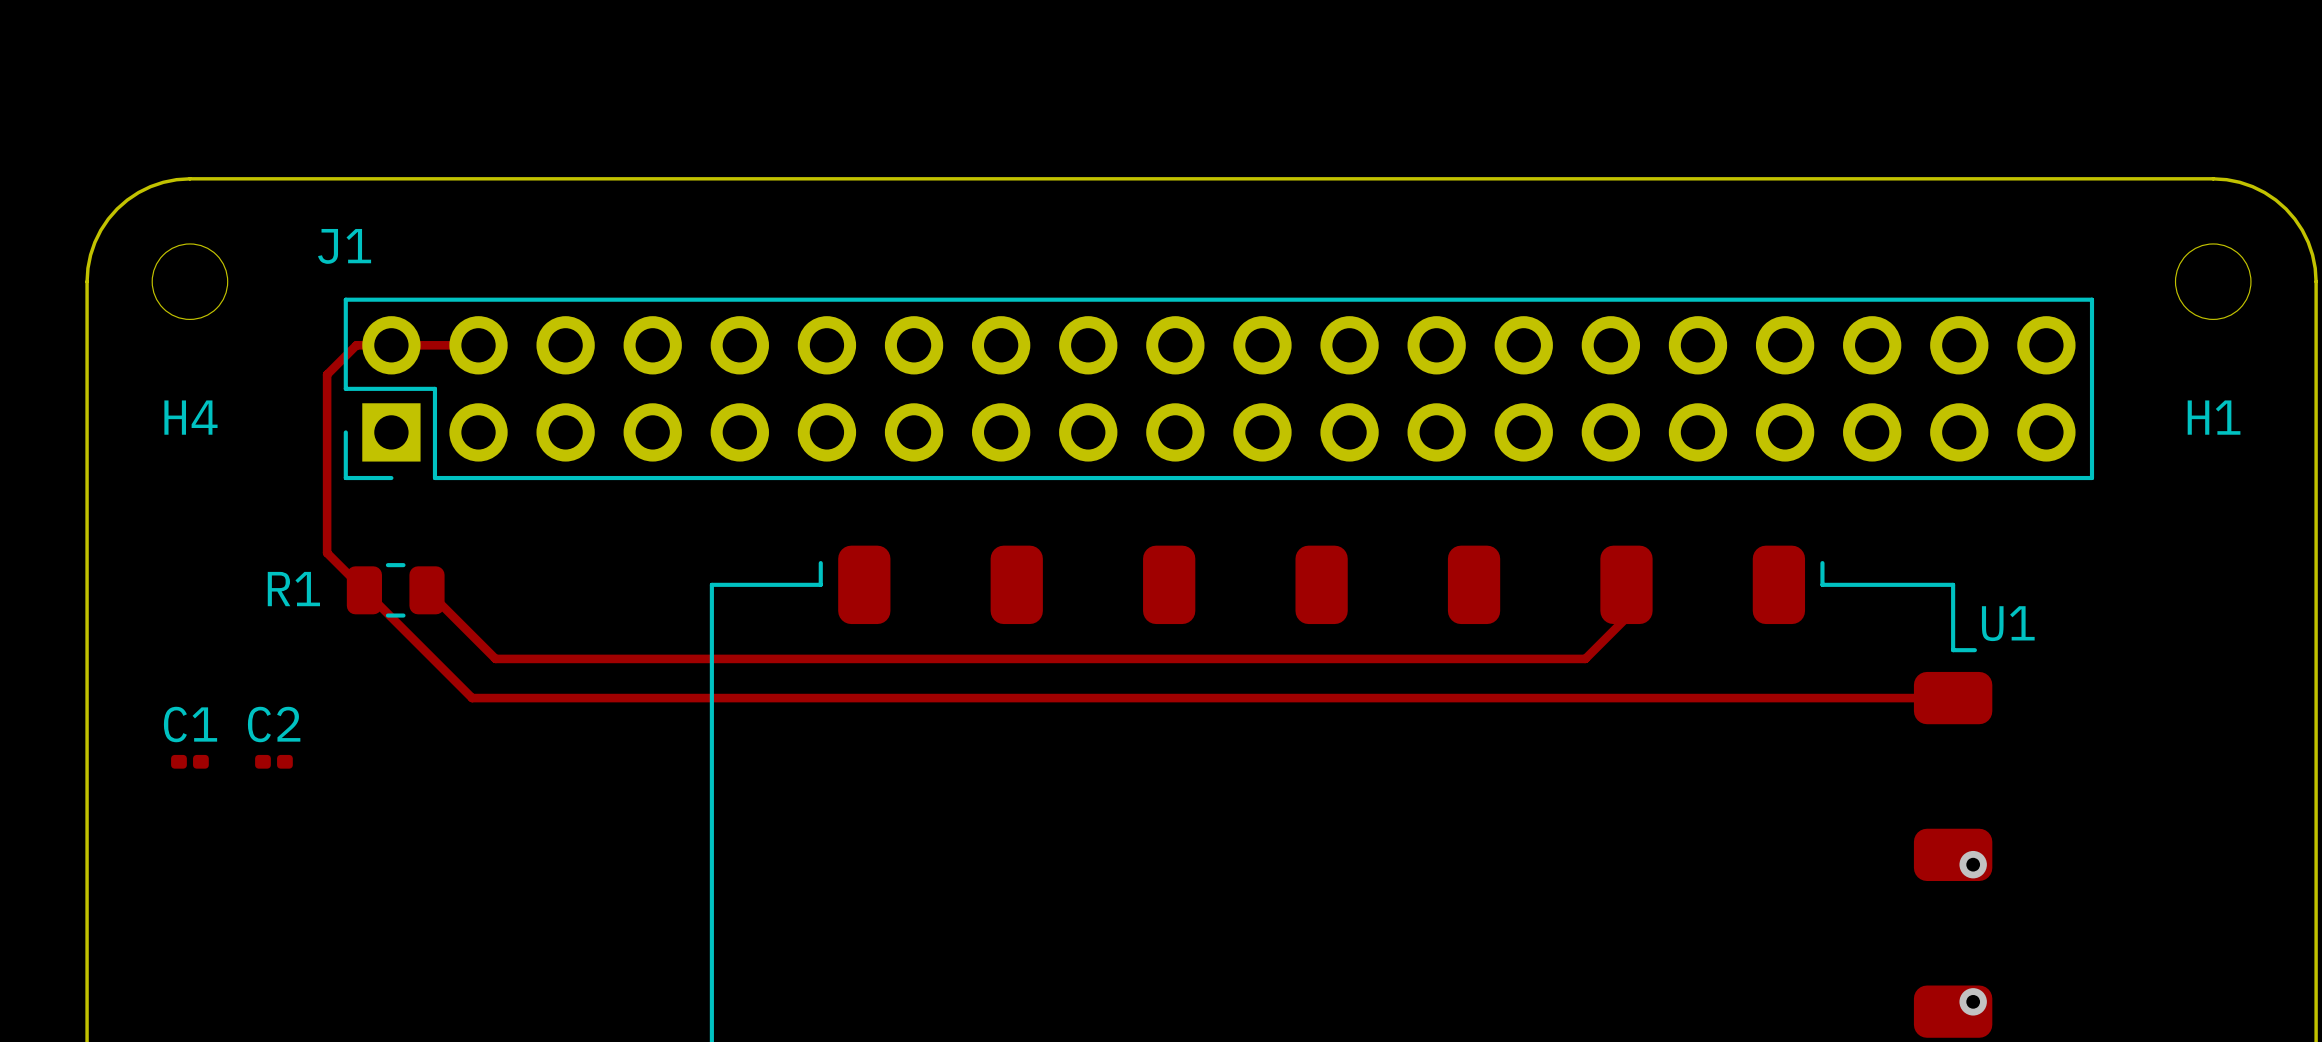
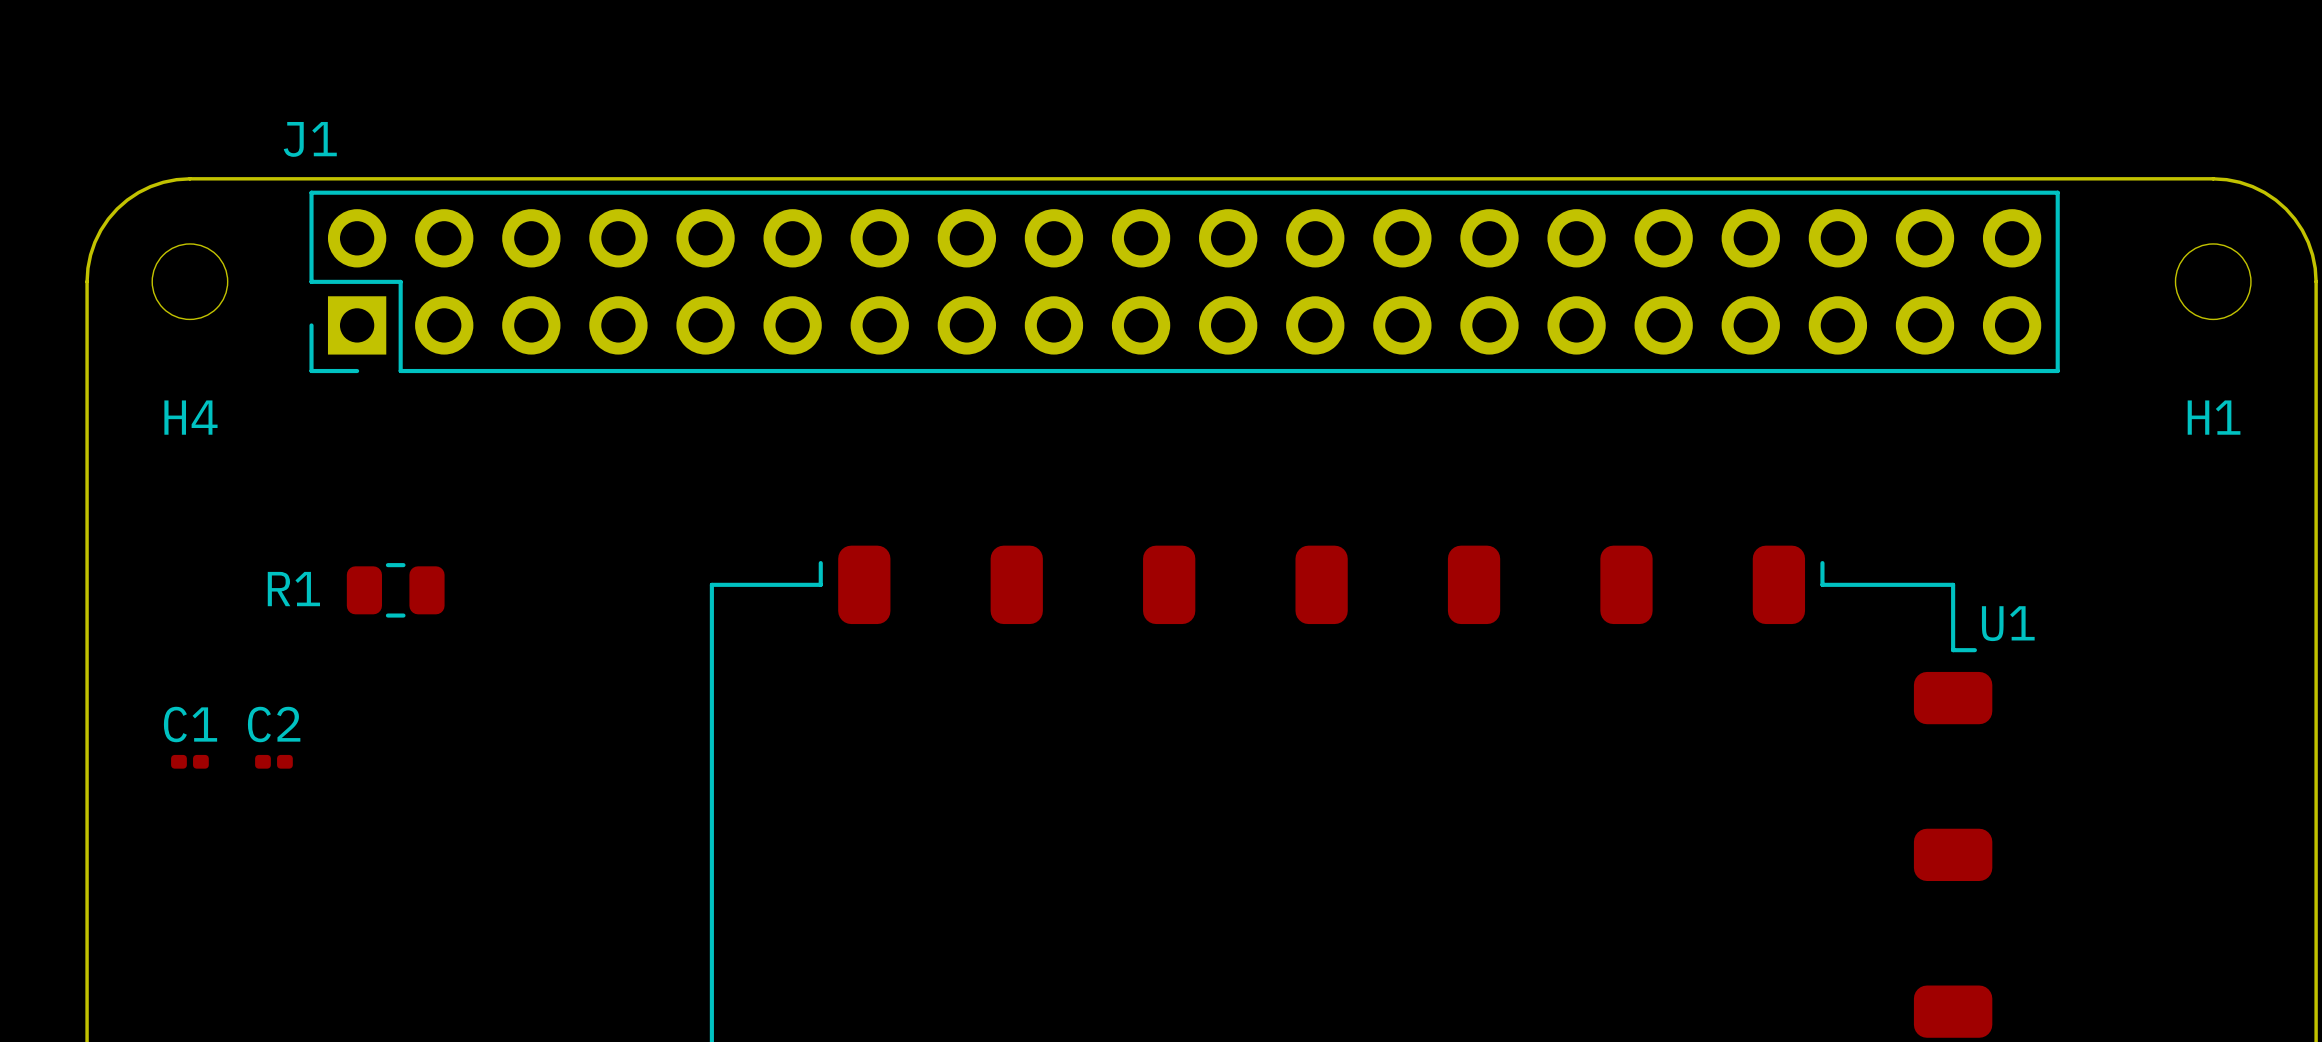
track: (478, 345) (356, 345) (327, 374) (327, 553) (472, 698) (1953, 698) -> none
J1 position: (1218, 388) -> (1184, 281)
track: (1626, 584) (1626, 617) (1585, 658) (495, 658) (426, 590) -> none
via: (1973, 864) -> none
via: (1973, 1001) -> none

